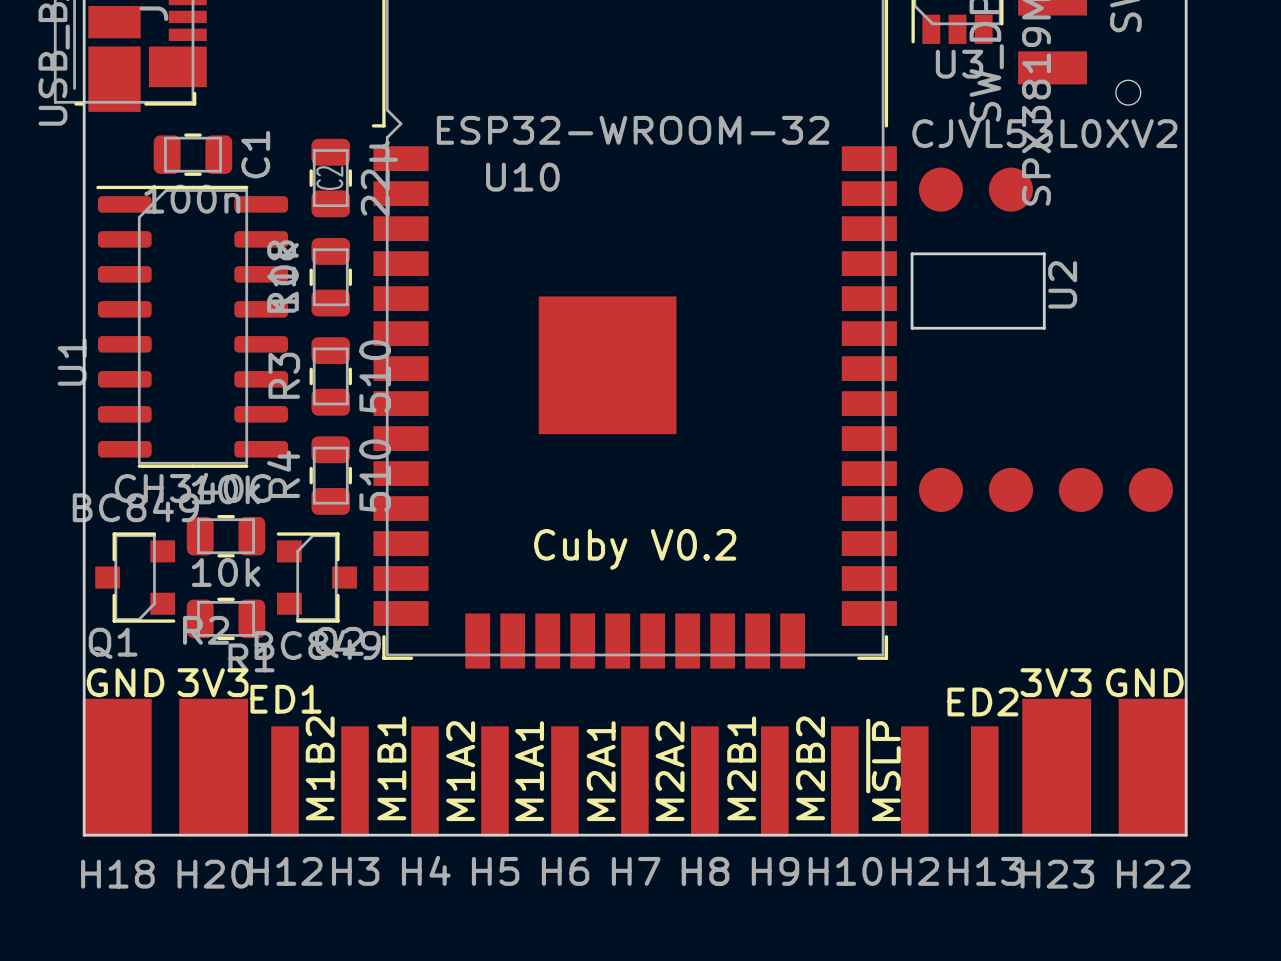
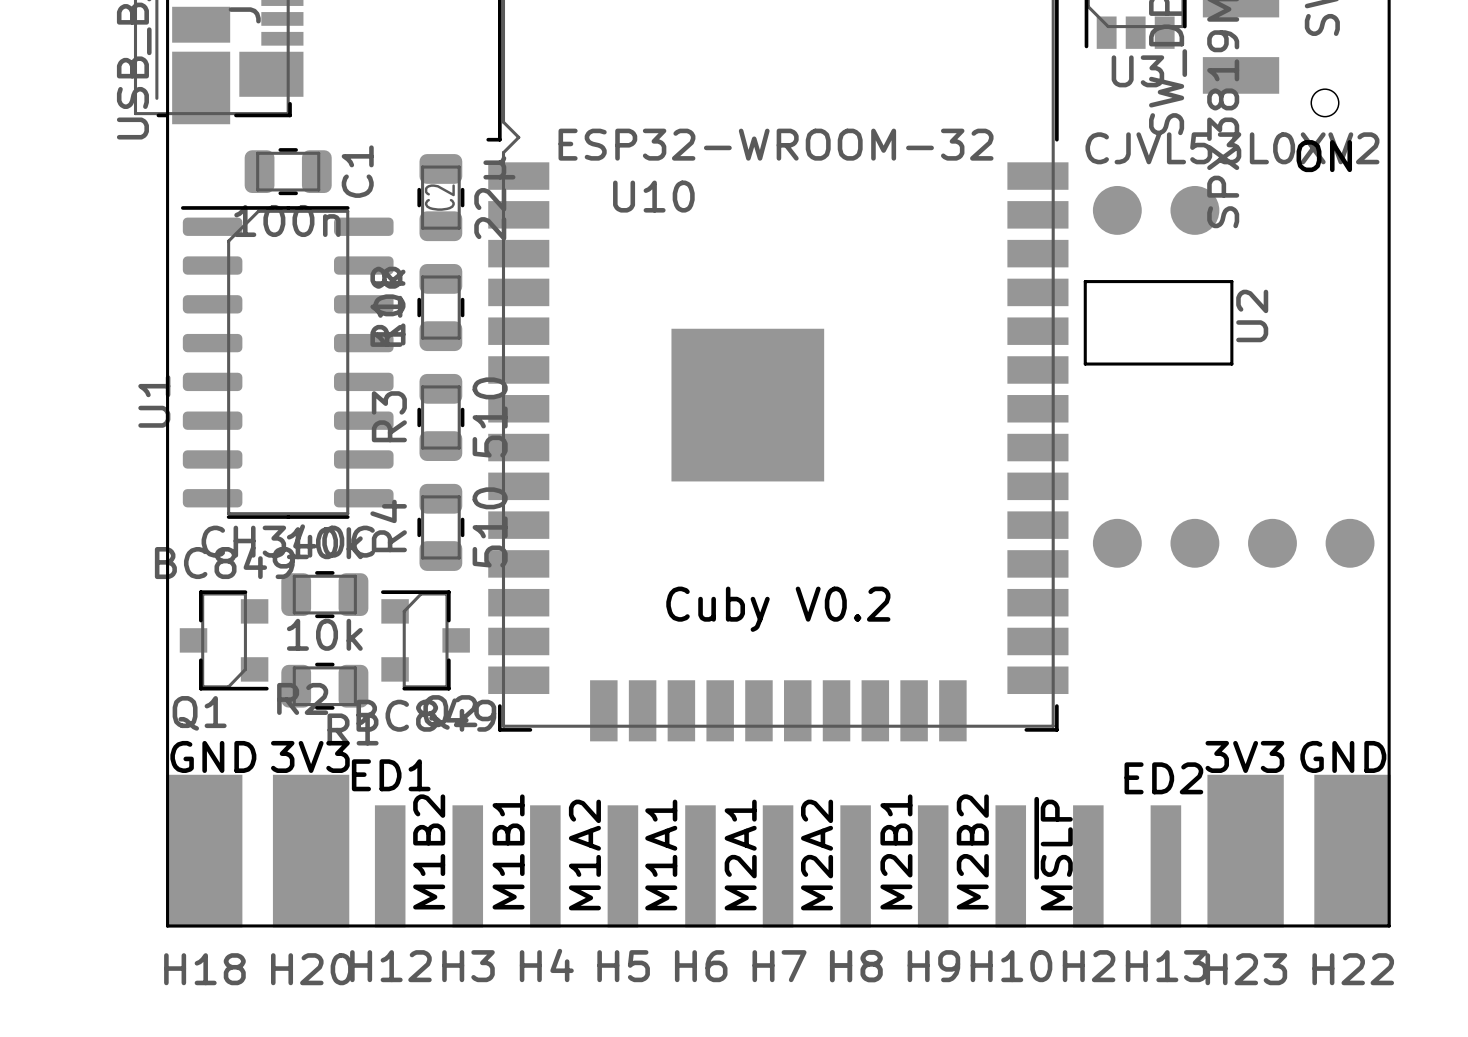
text: none -> ON (1324, 156)

